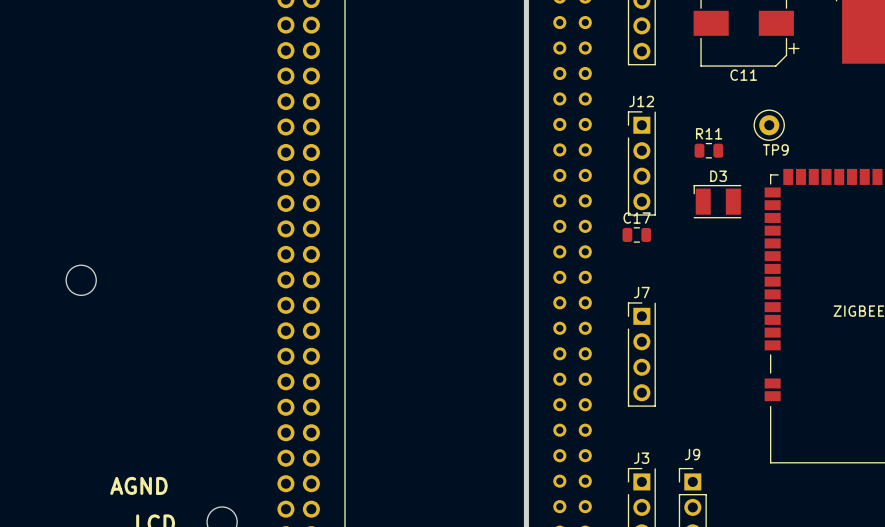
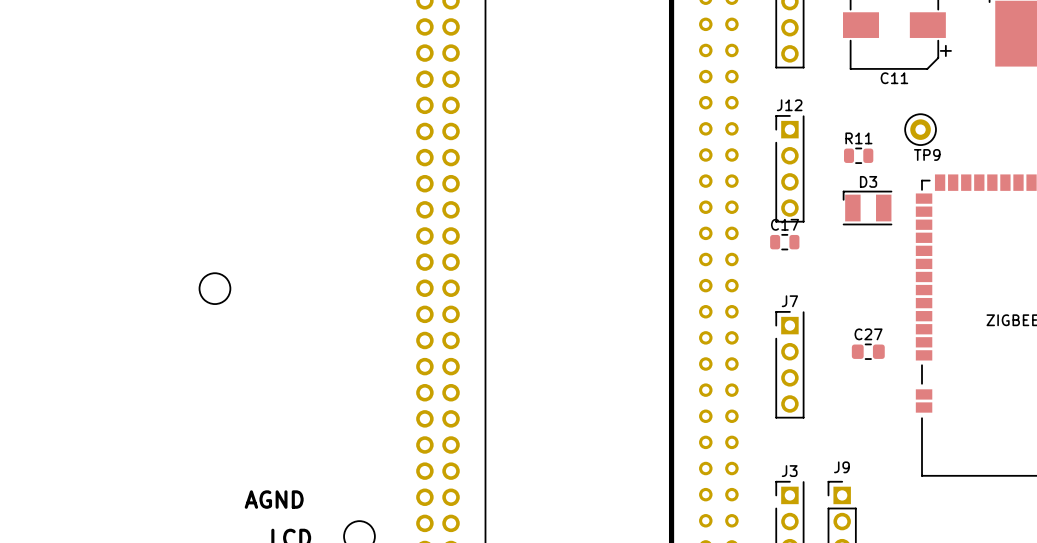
C27: none -> (868, 351)

